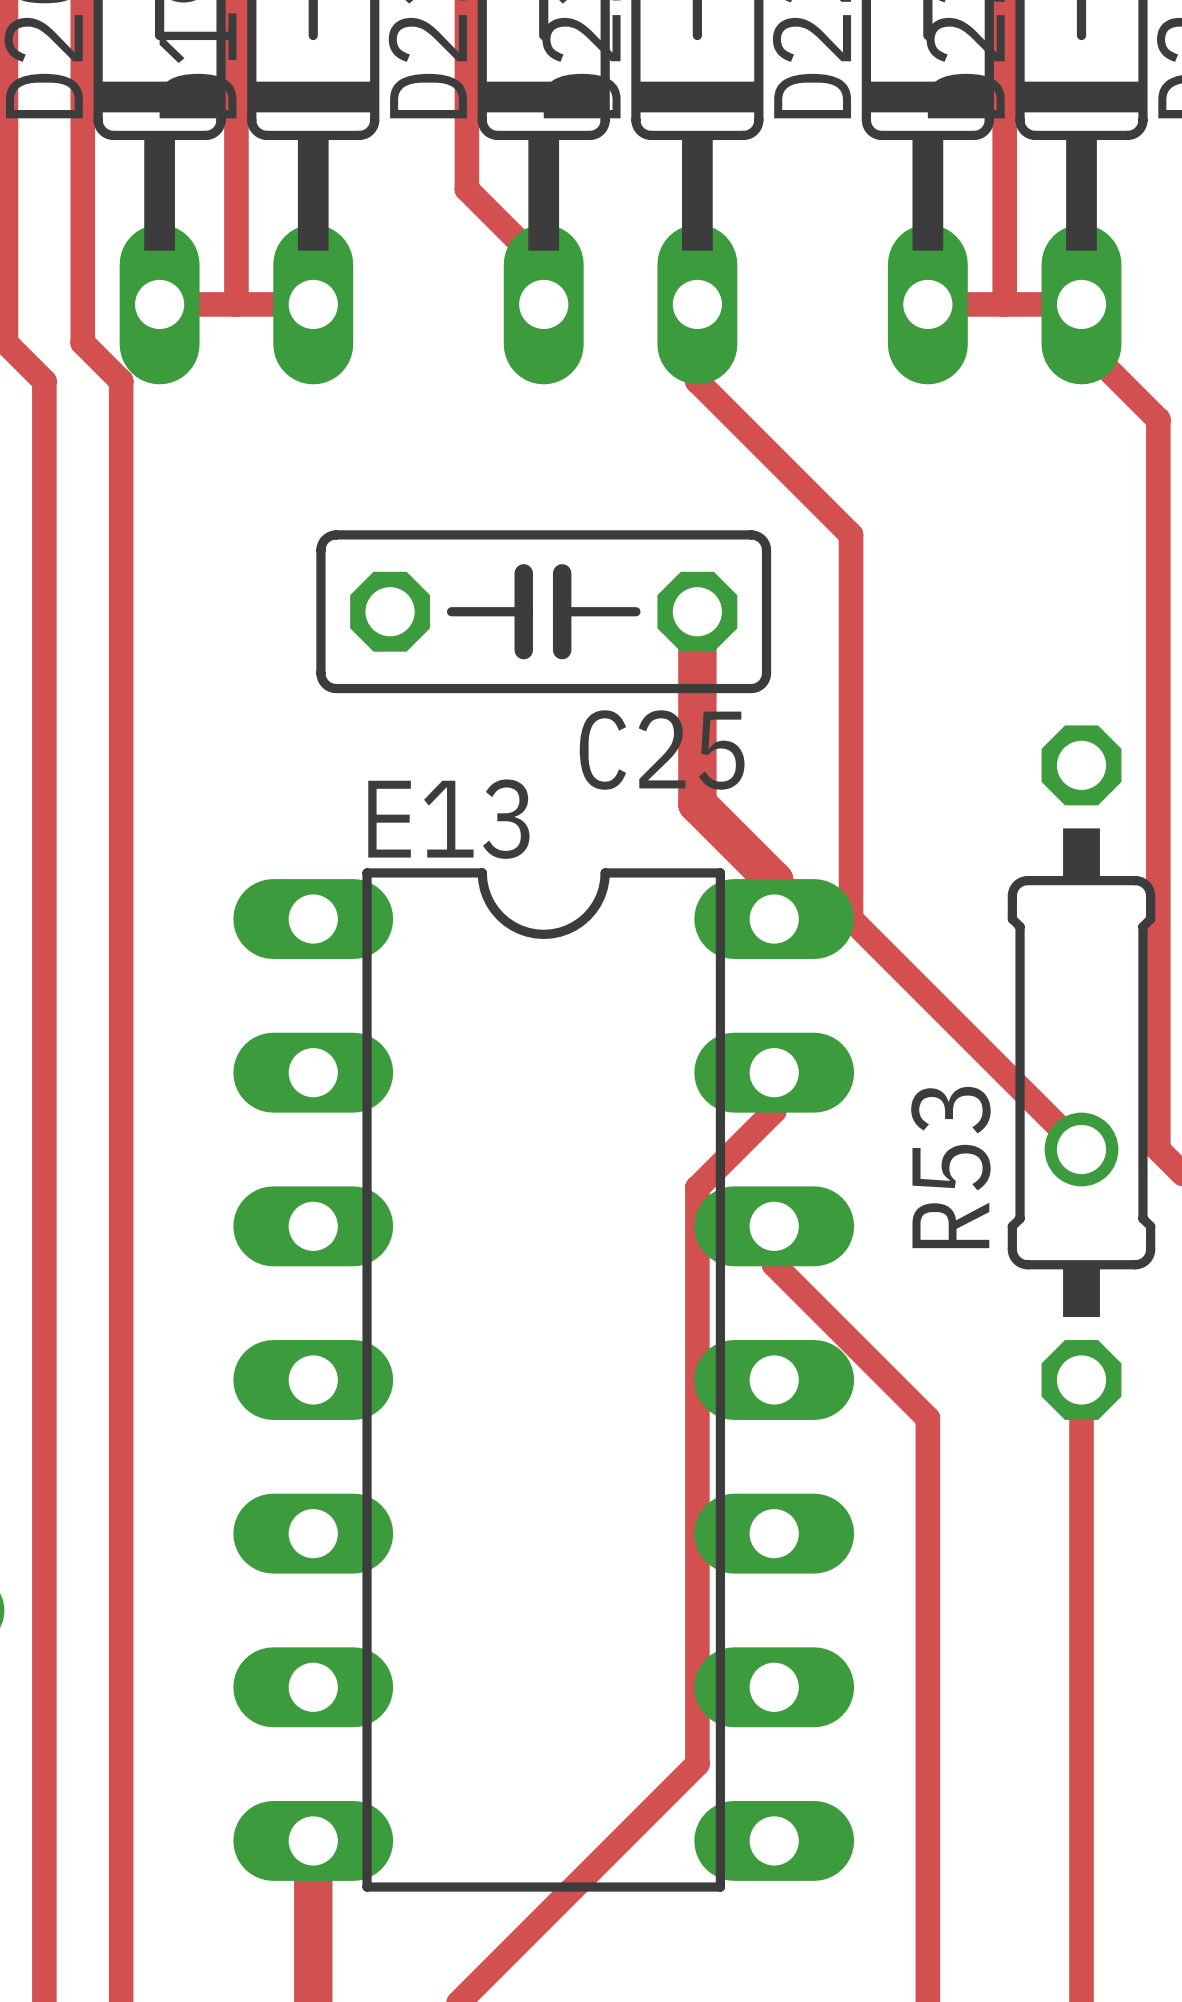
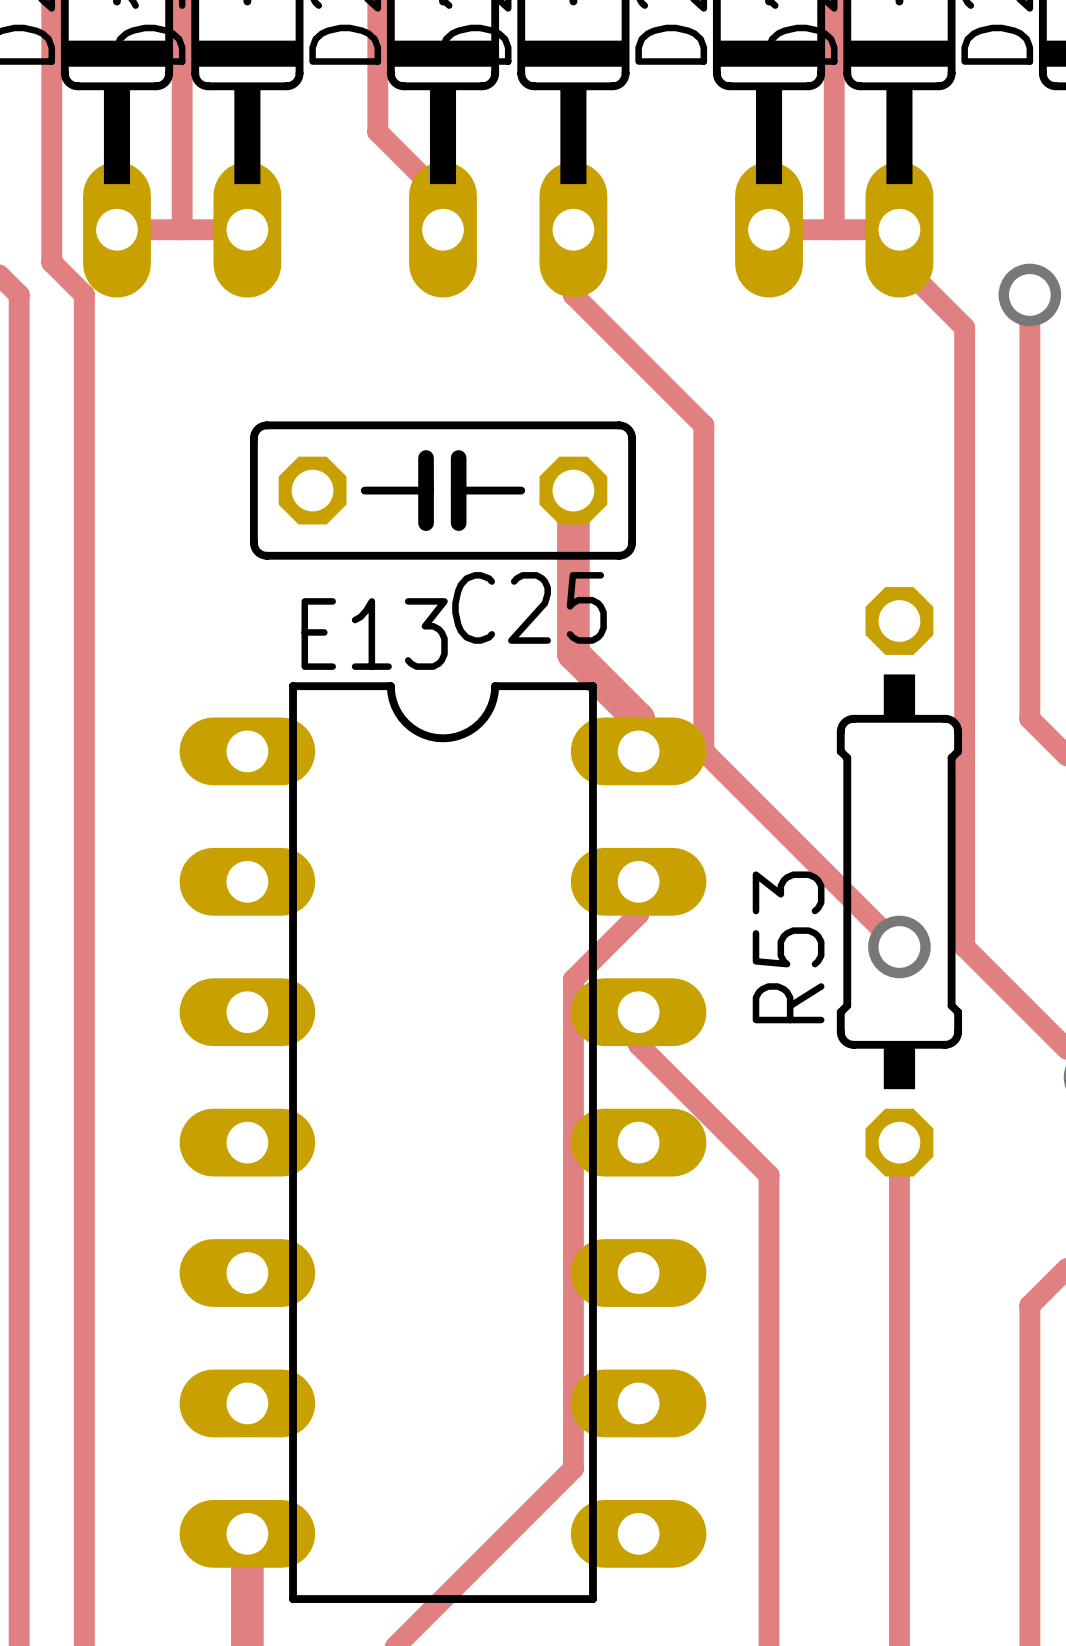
E13 name position: E13 (448, 819) -> E13 (374, 634)
E13 footprint: [233, 868, 855, 1892] -> [179, 682, 707, 1603]

